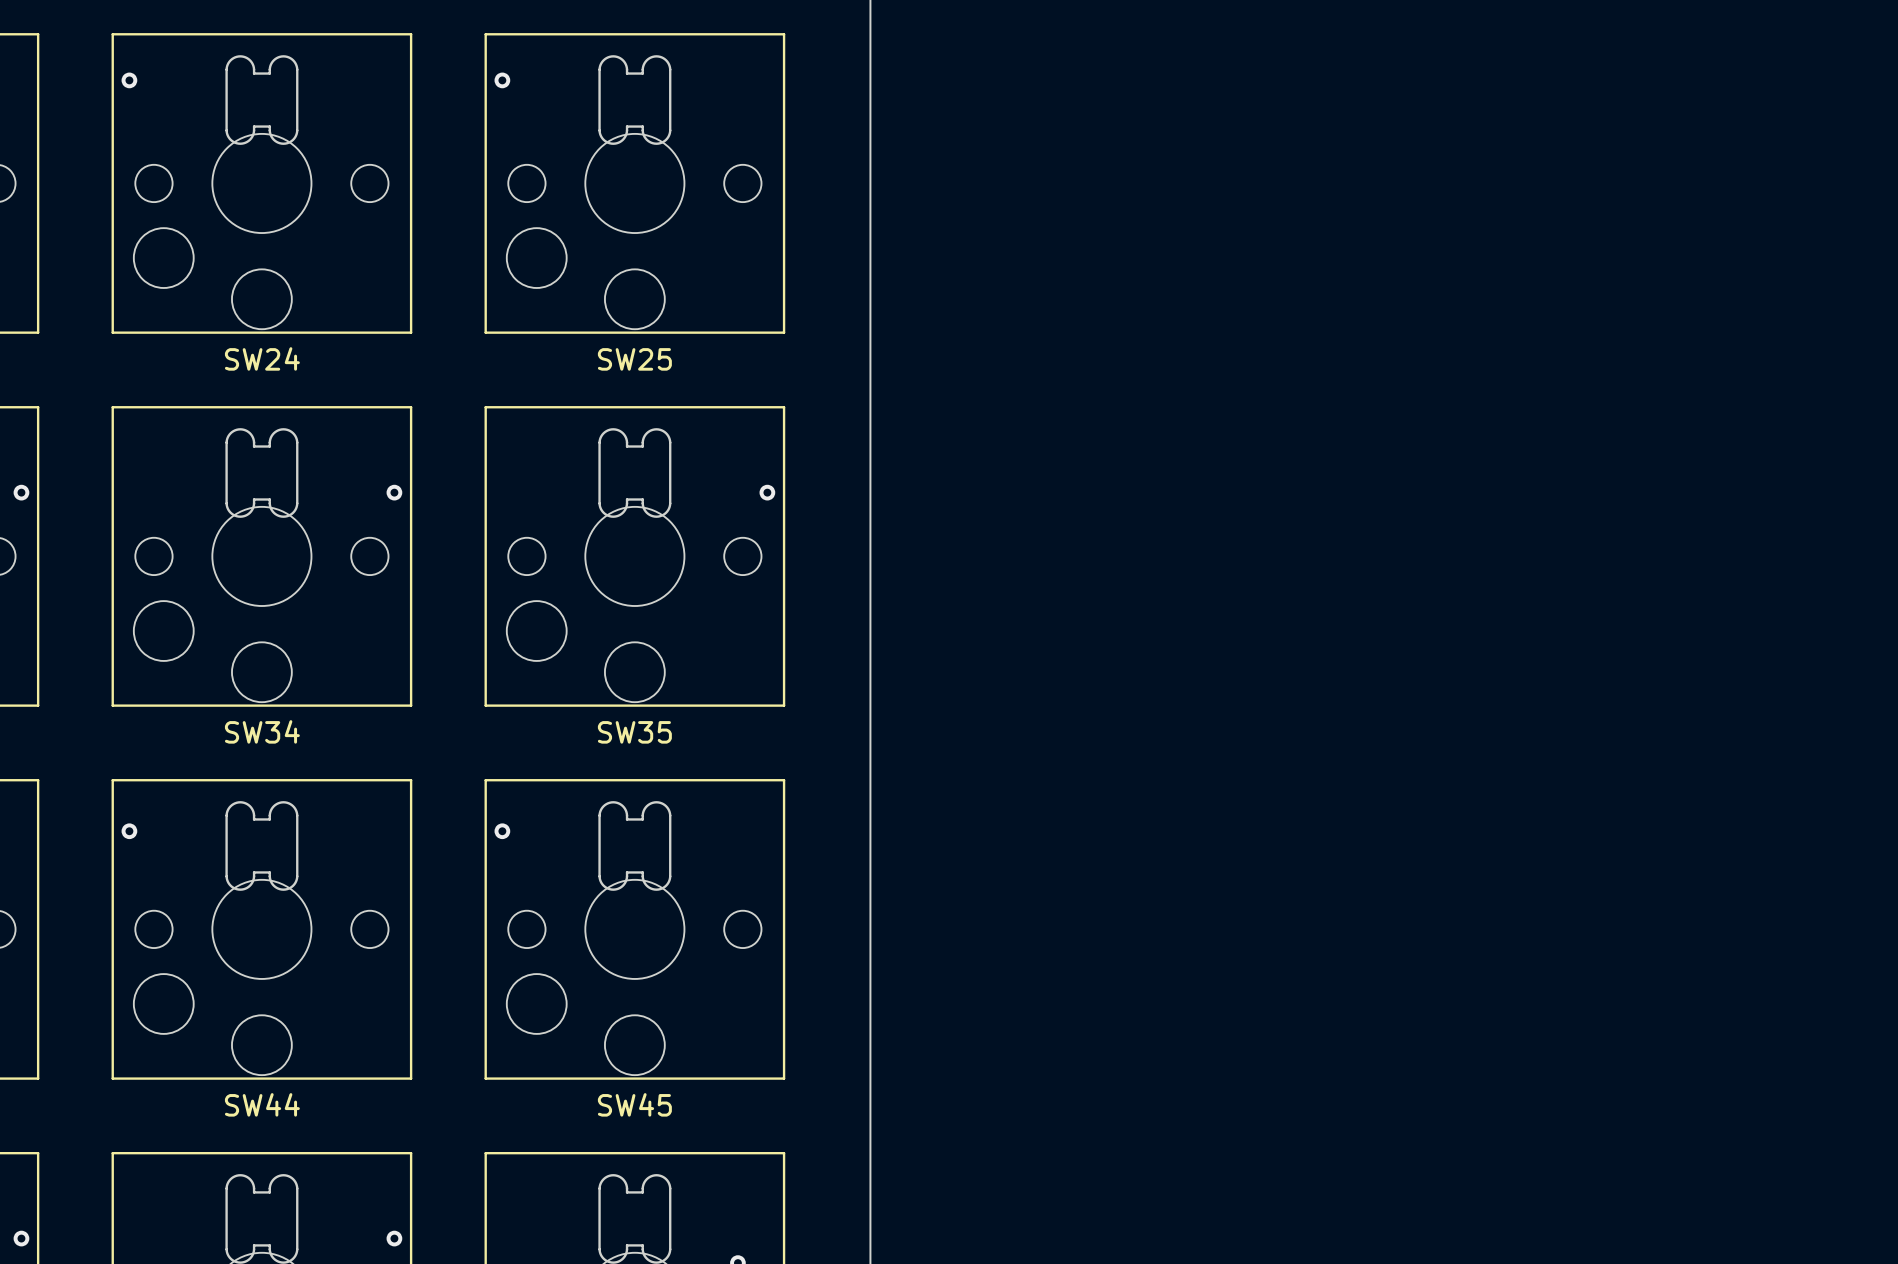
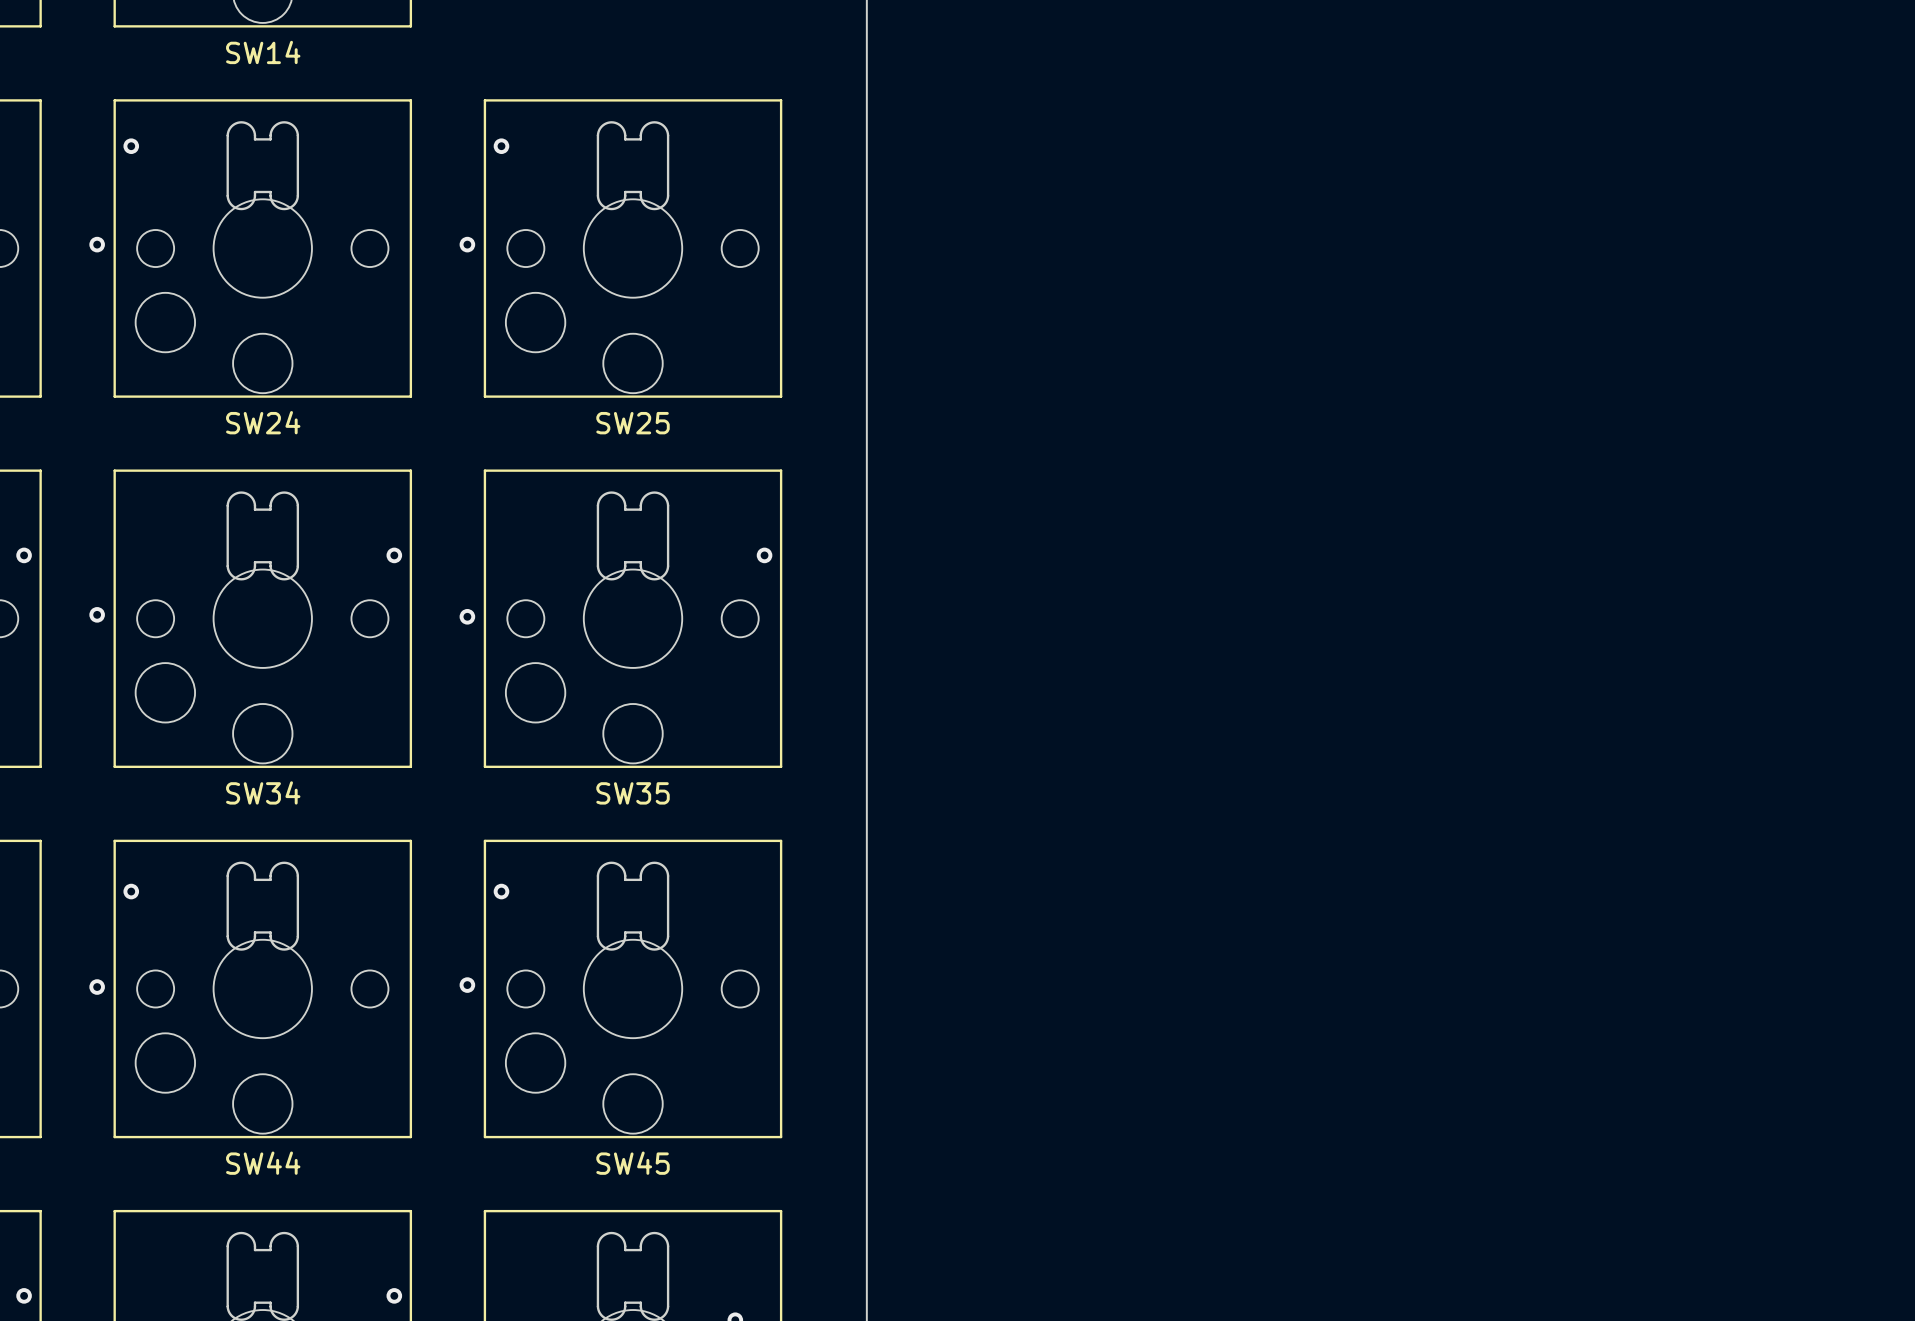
via: none -> (97, 244)
via: none -> (467, 244)
via: none -> (97, 614)
via: none -> (467, 616)
via: none -> (467, 985)
via: none -> (97, 987)

